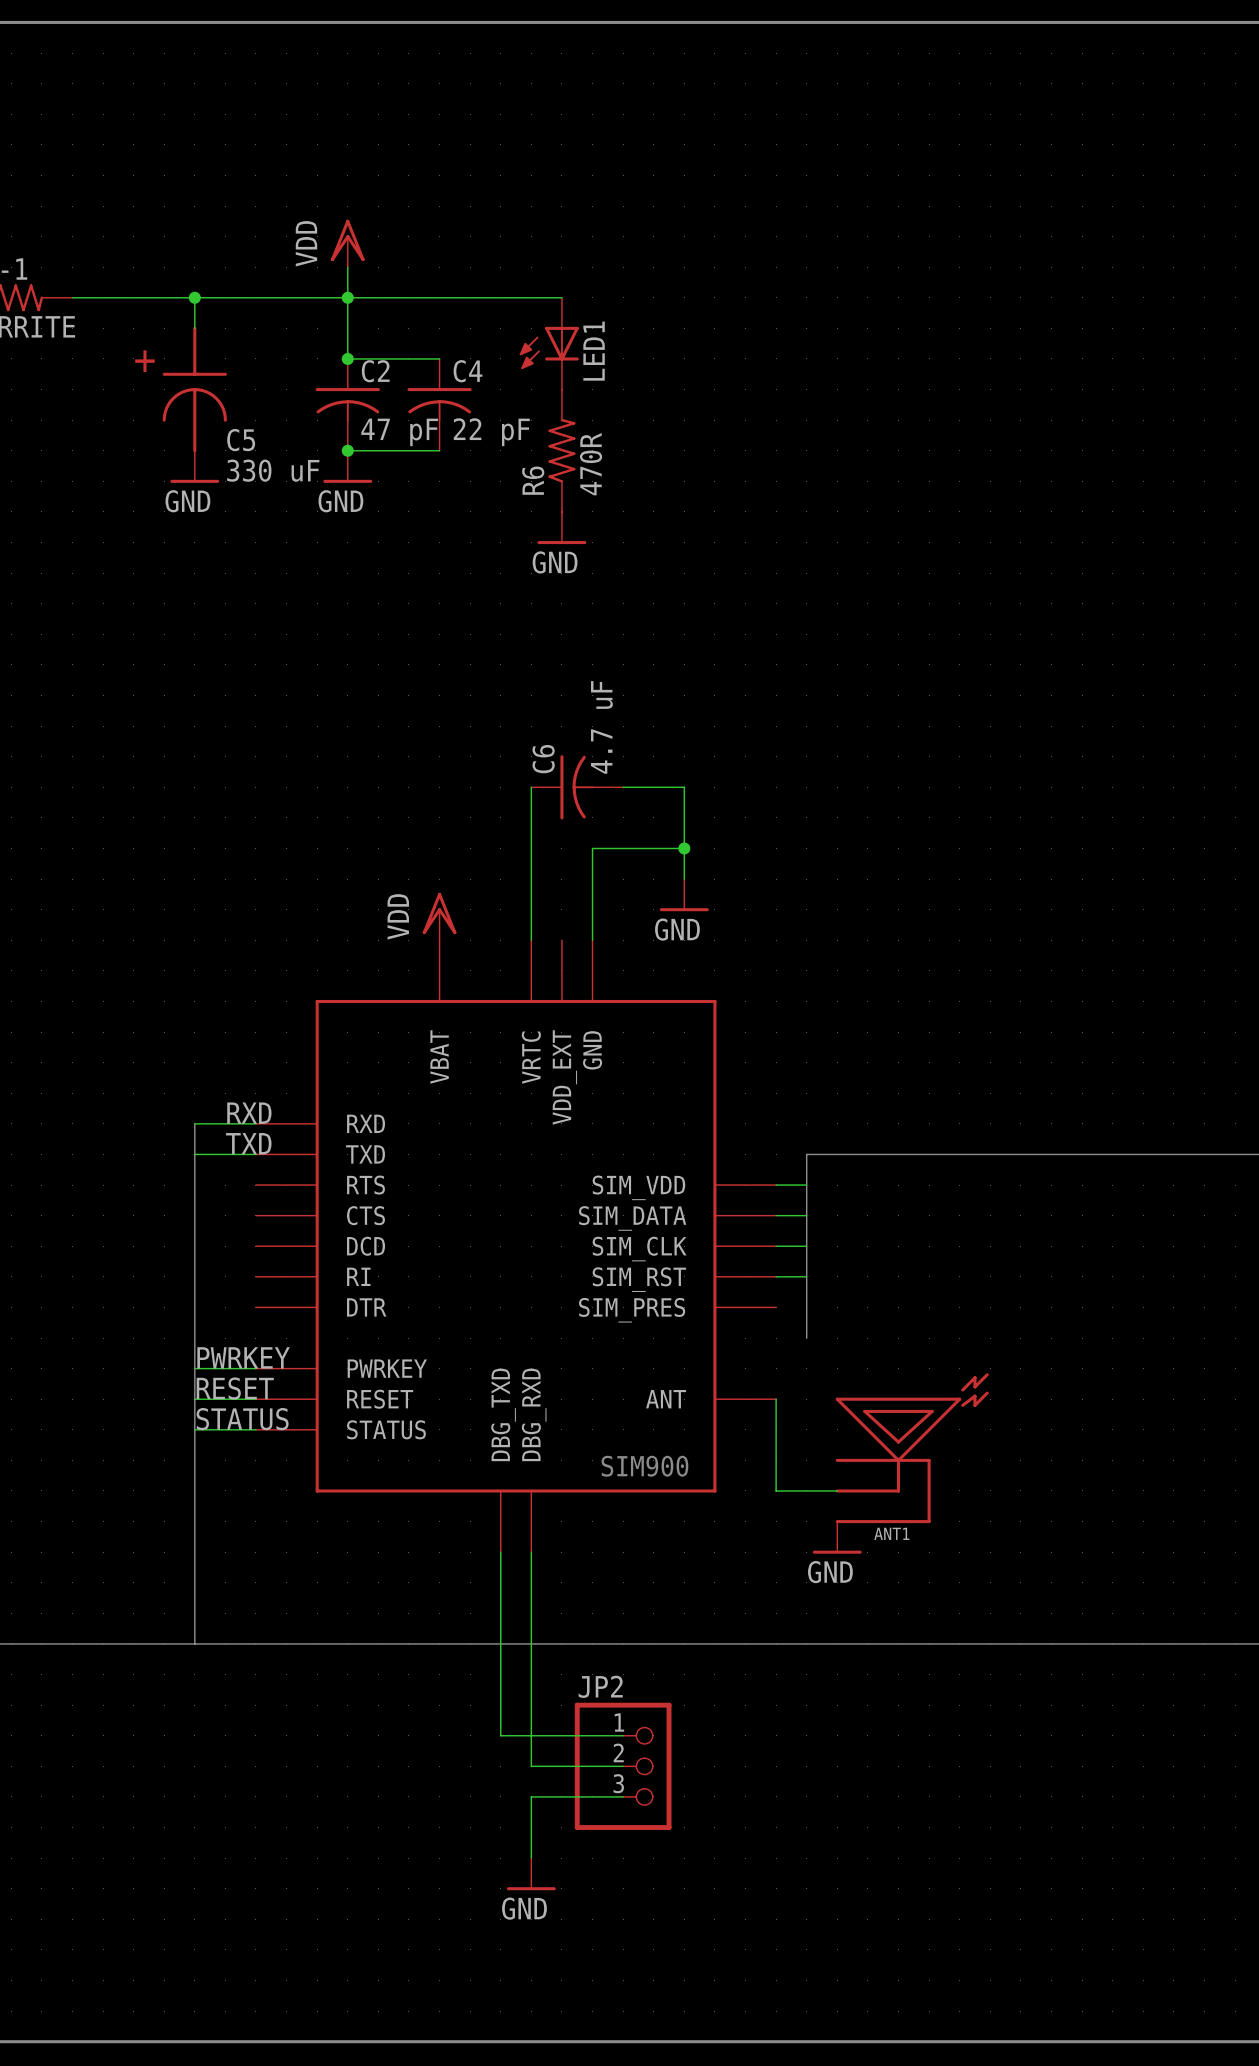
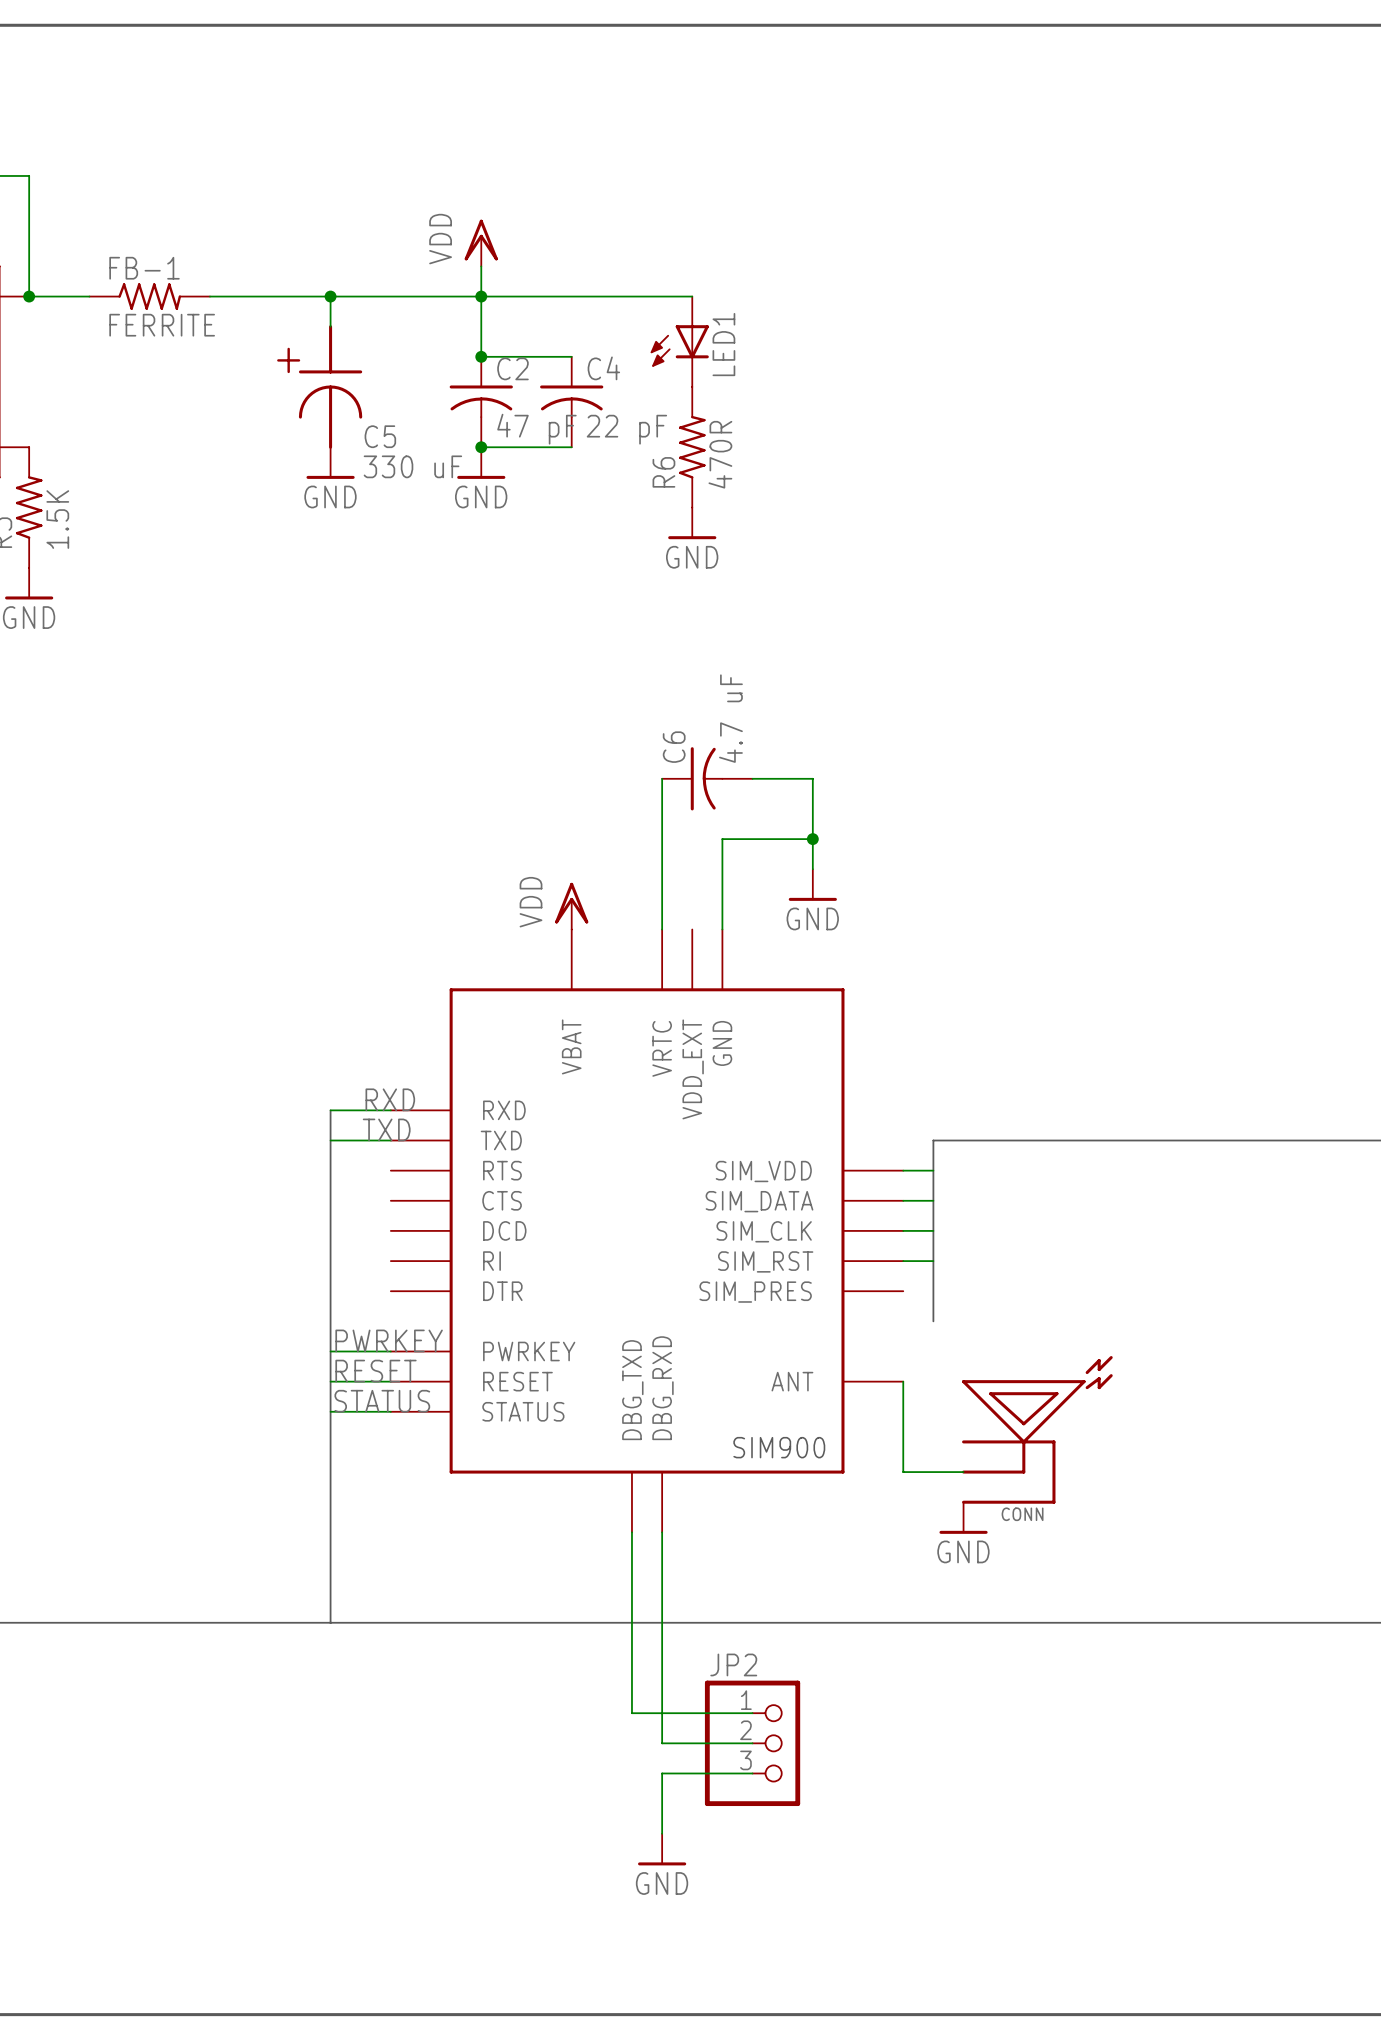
ANT1 name: ANT1 (891, 1533) -> CONN (1022, 1514)

